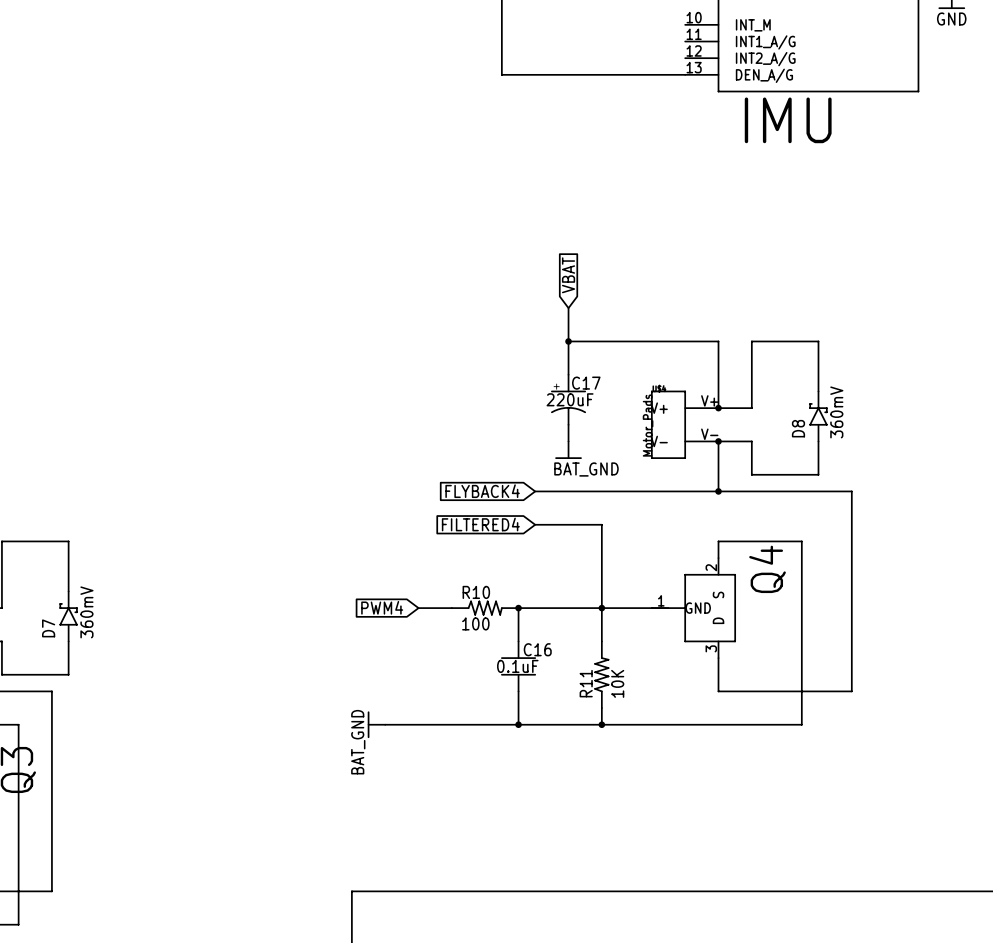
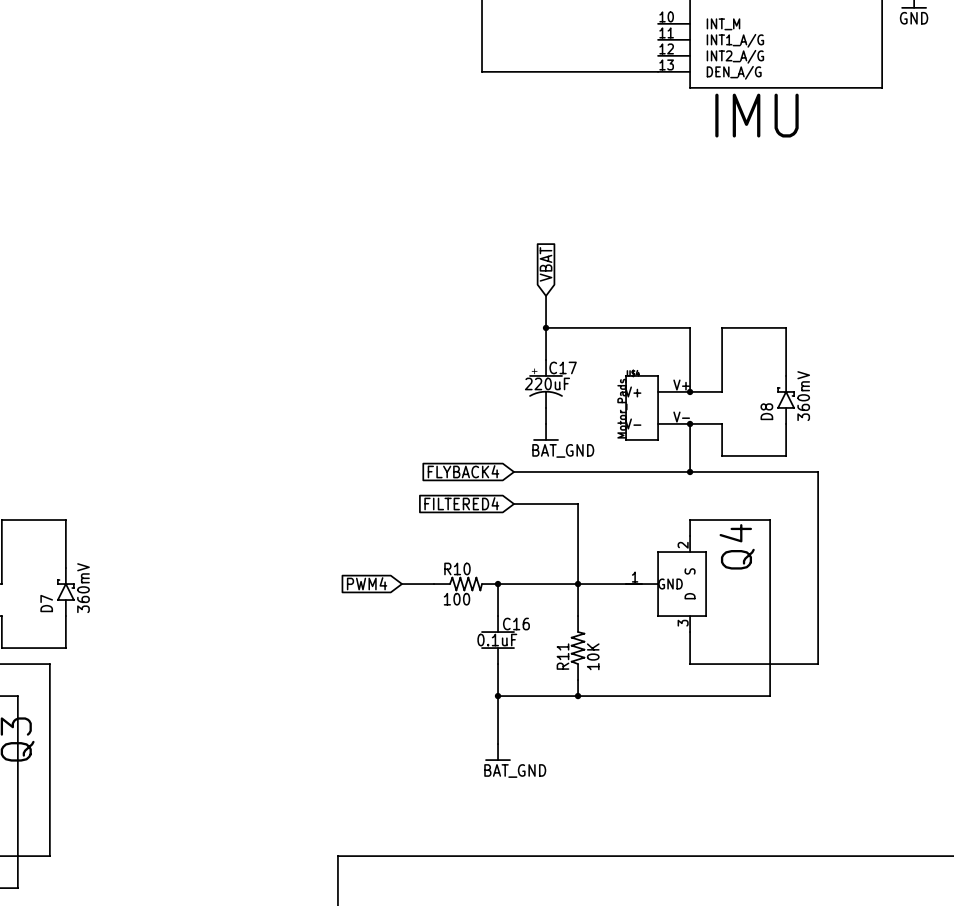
power symbol rotation: 0° (368, 724) -> 90° counterclockwise (498, 760)
power symbol position: BAT_GND (376, 724) -> BAT_GND (498, 752)
wire: (385, 724) (518, 724) -> (498, 744) (498, 696)

